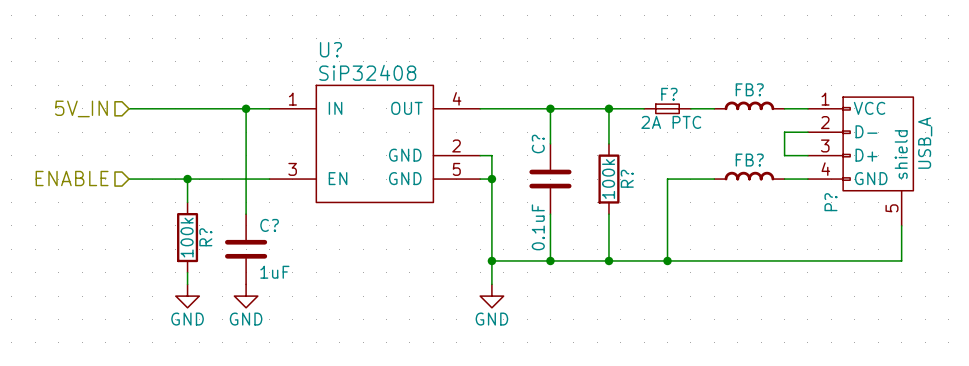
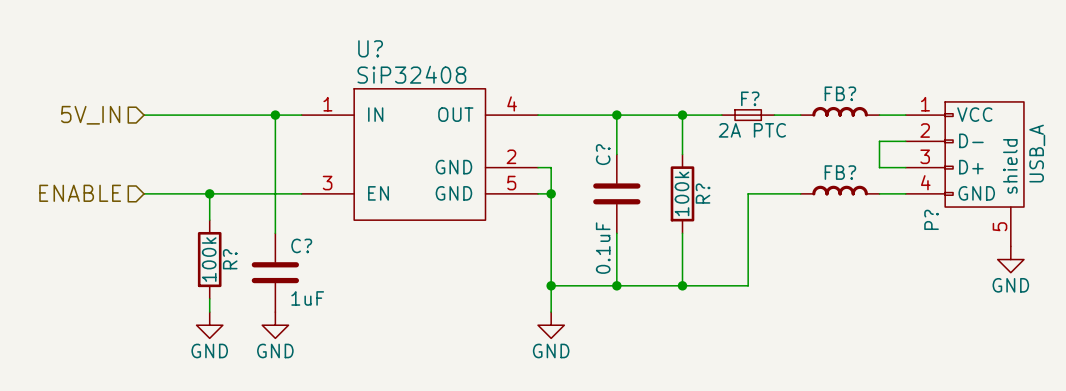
wire: (901, 225) (901, 260) (667, 260) -> none
power symbol: none -> GND (1010, 259)
junction: (667, 260) -> none

